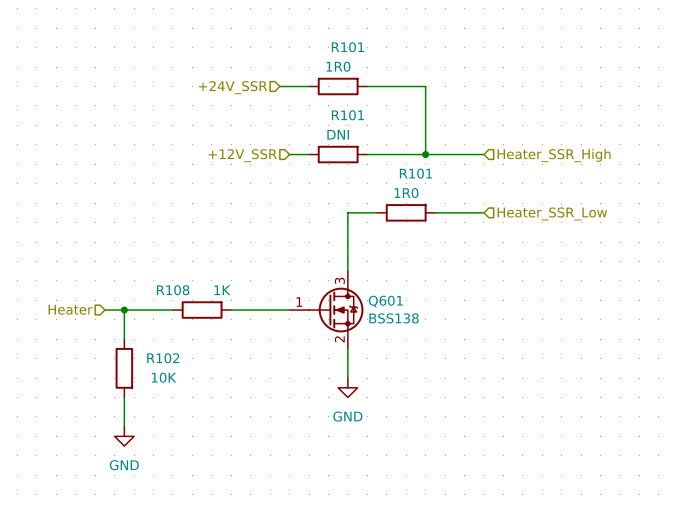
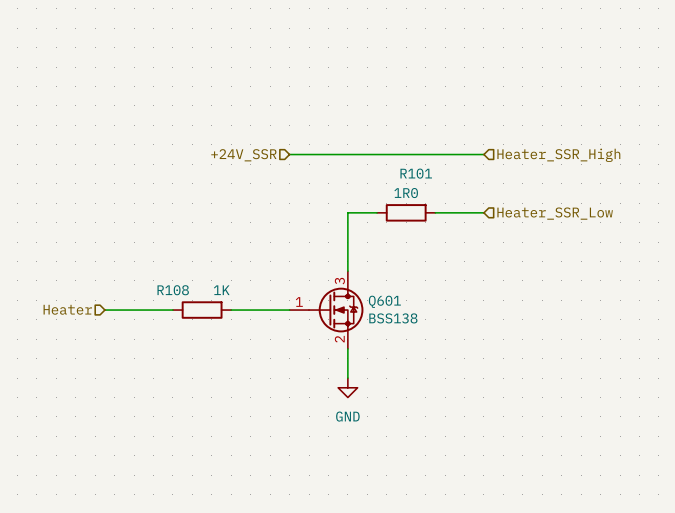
wire: (279, 86) (309, 86) -> none
R101: 1R0 (338, 86) -> none
wire: (367, 86) (425, 86) (425, 154) -> none
hierarchical label: +24V_SSR (232, 87) -> none
wire: none -> (309, 154) (367, 154)
R101: DNI (338, 154) -> none
junction: (425, 154) -> none
hierarchical label: +12V_SSR (242, 155) -> +24V_SSR (243, 155)
wire: (124, 310) (124, 339) -> none
junction: (124, 310) -> none
R102: 10K (124, 368) -> none
wire: (124, 397) (124, 426) -> none
power symbol: GND (124, 436) -> none

